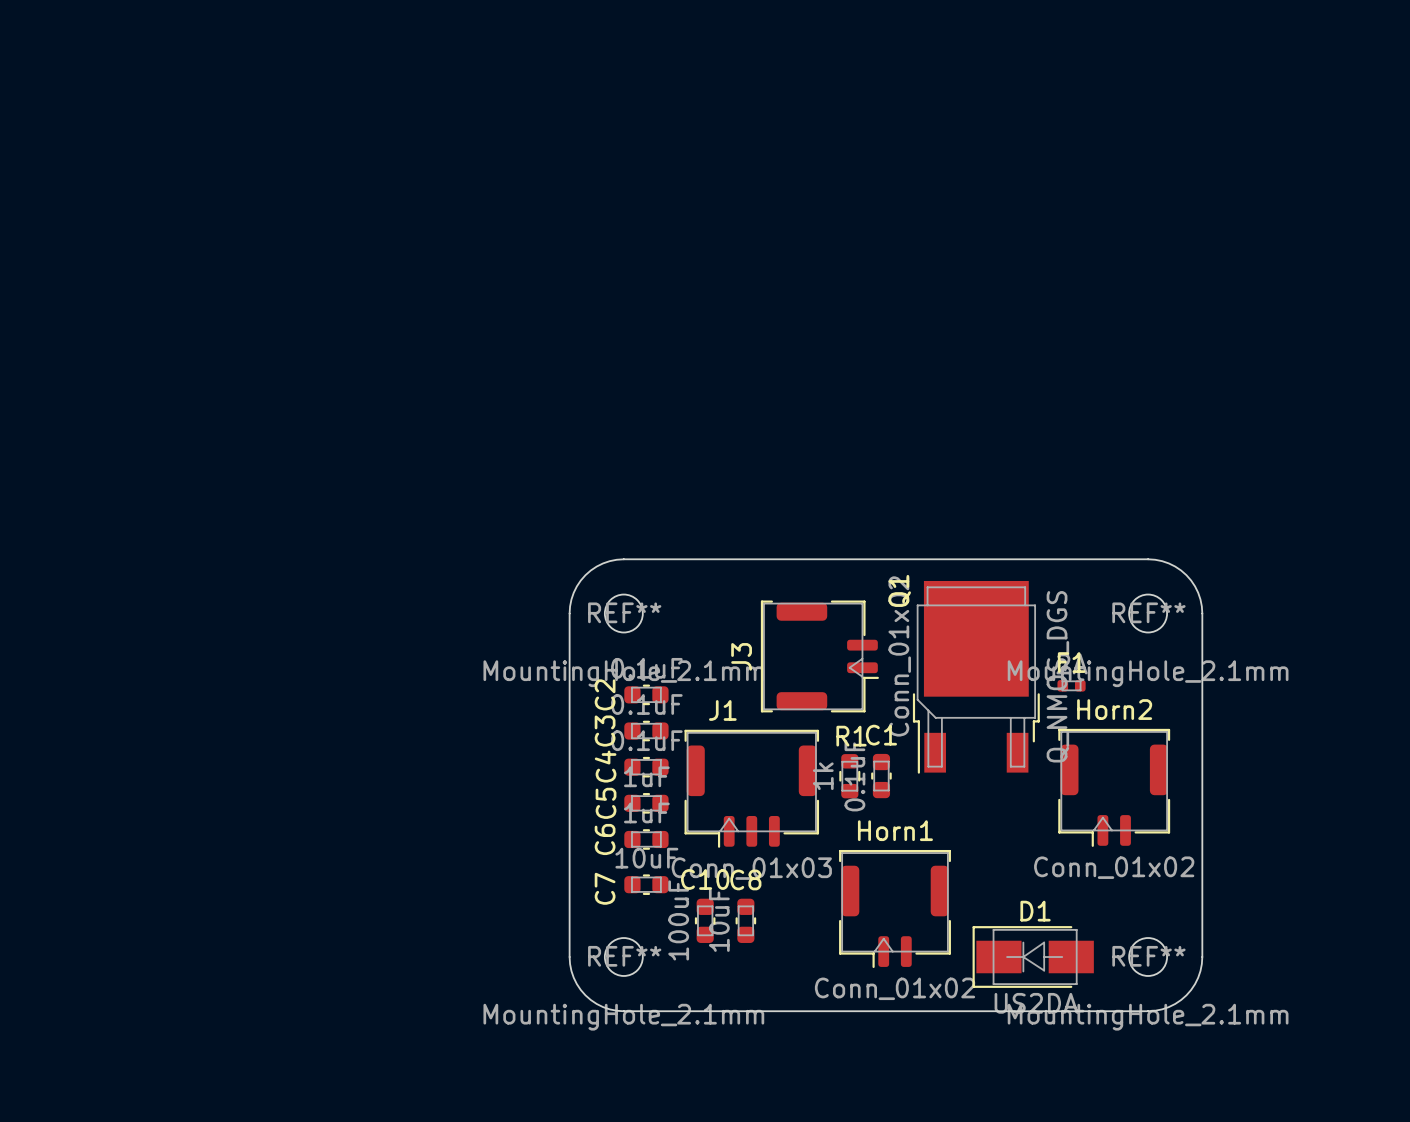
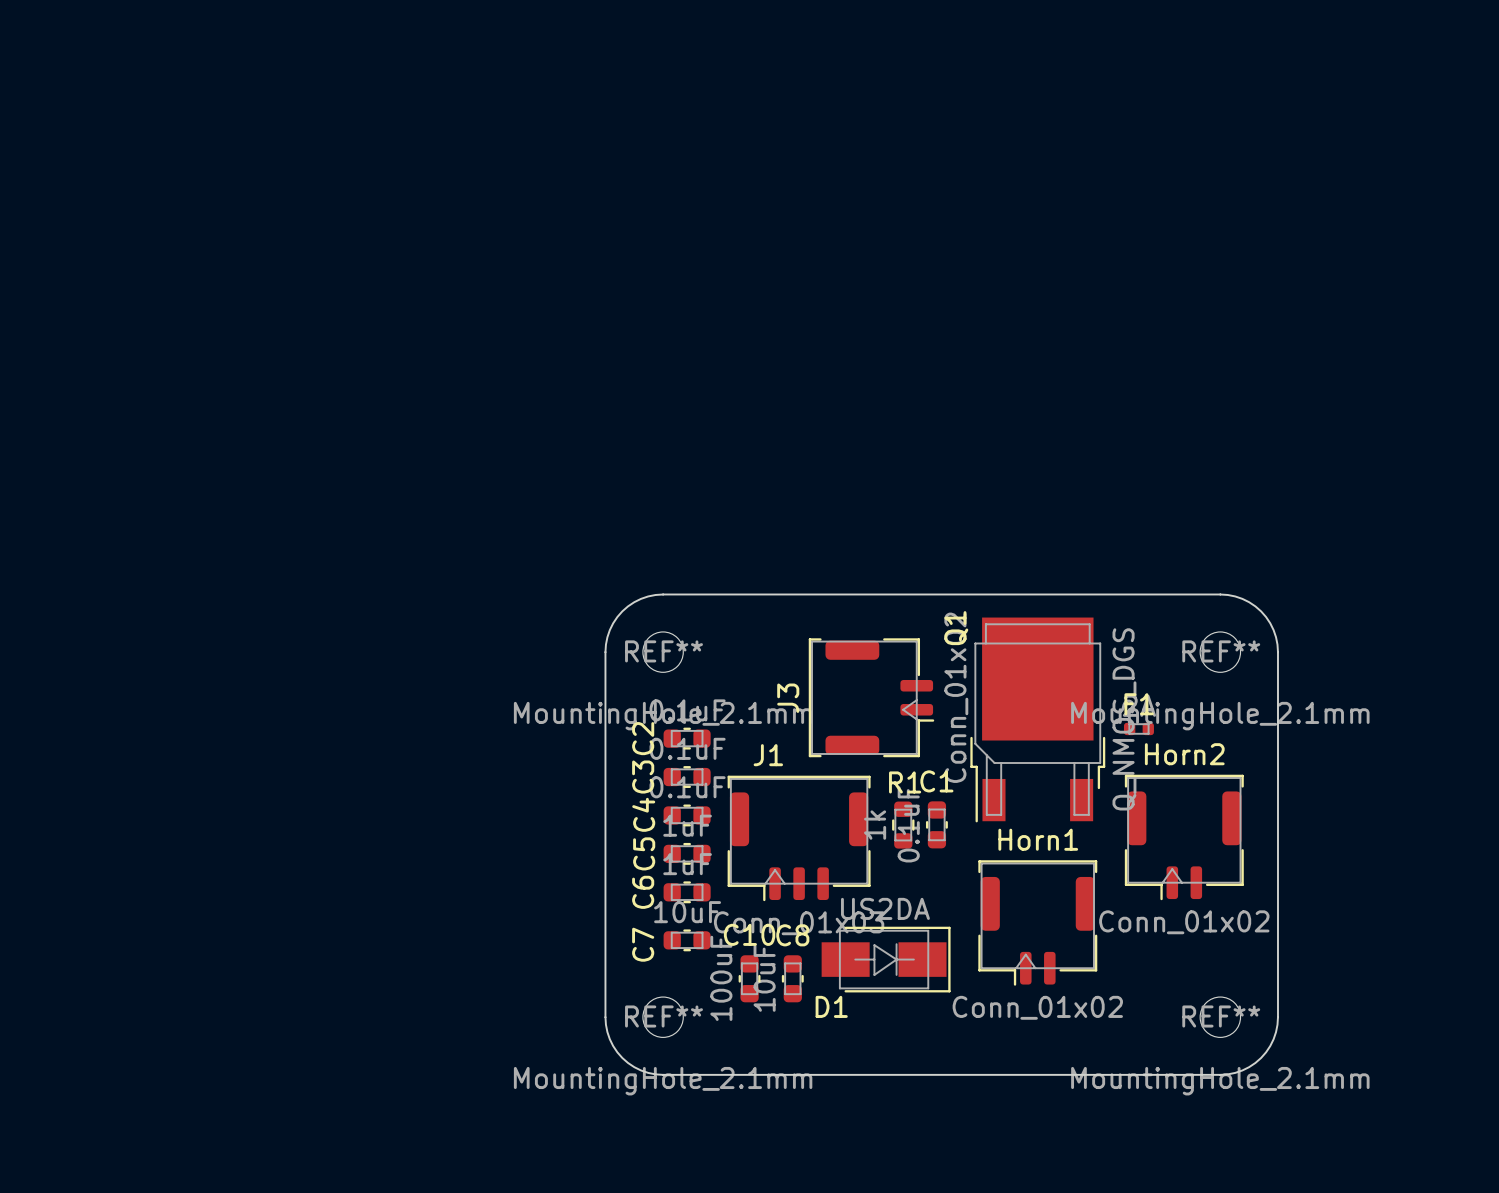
Horn1 position: (895, 909) -> (1037, 922)
D1 name position: D1 (1035, 911) -> D1 (831, 1006)
D1 rotation: 0° (1033, 956) -> 180° (886, 959)
D1 position: (1033, 956) -> (886, 959)

